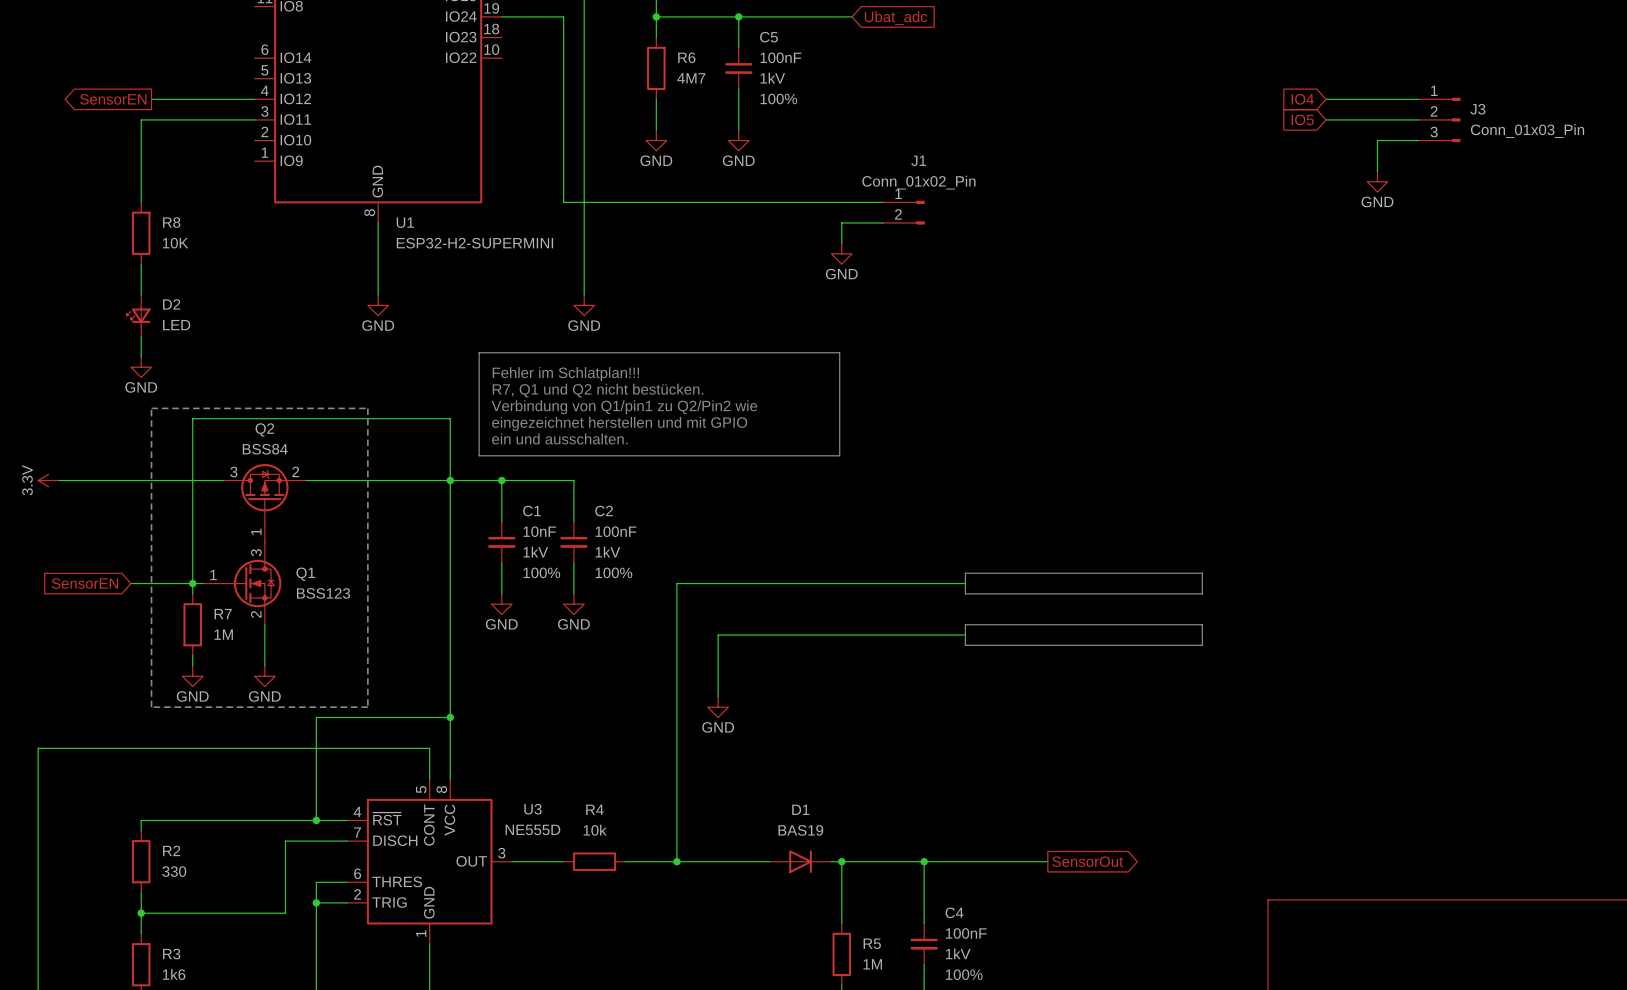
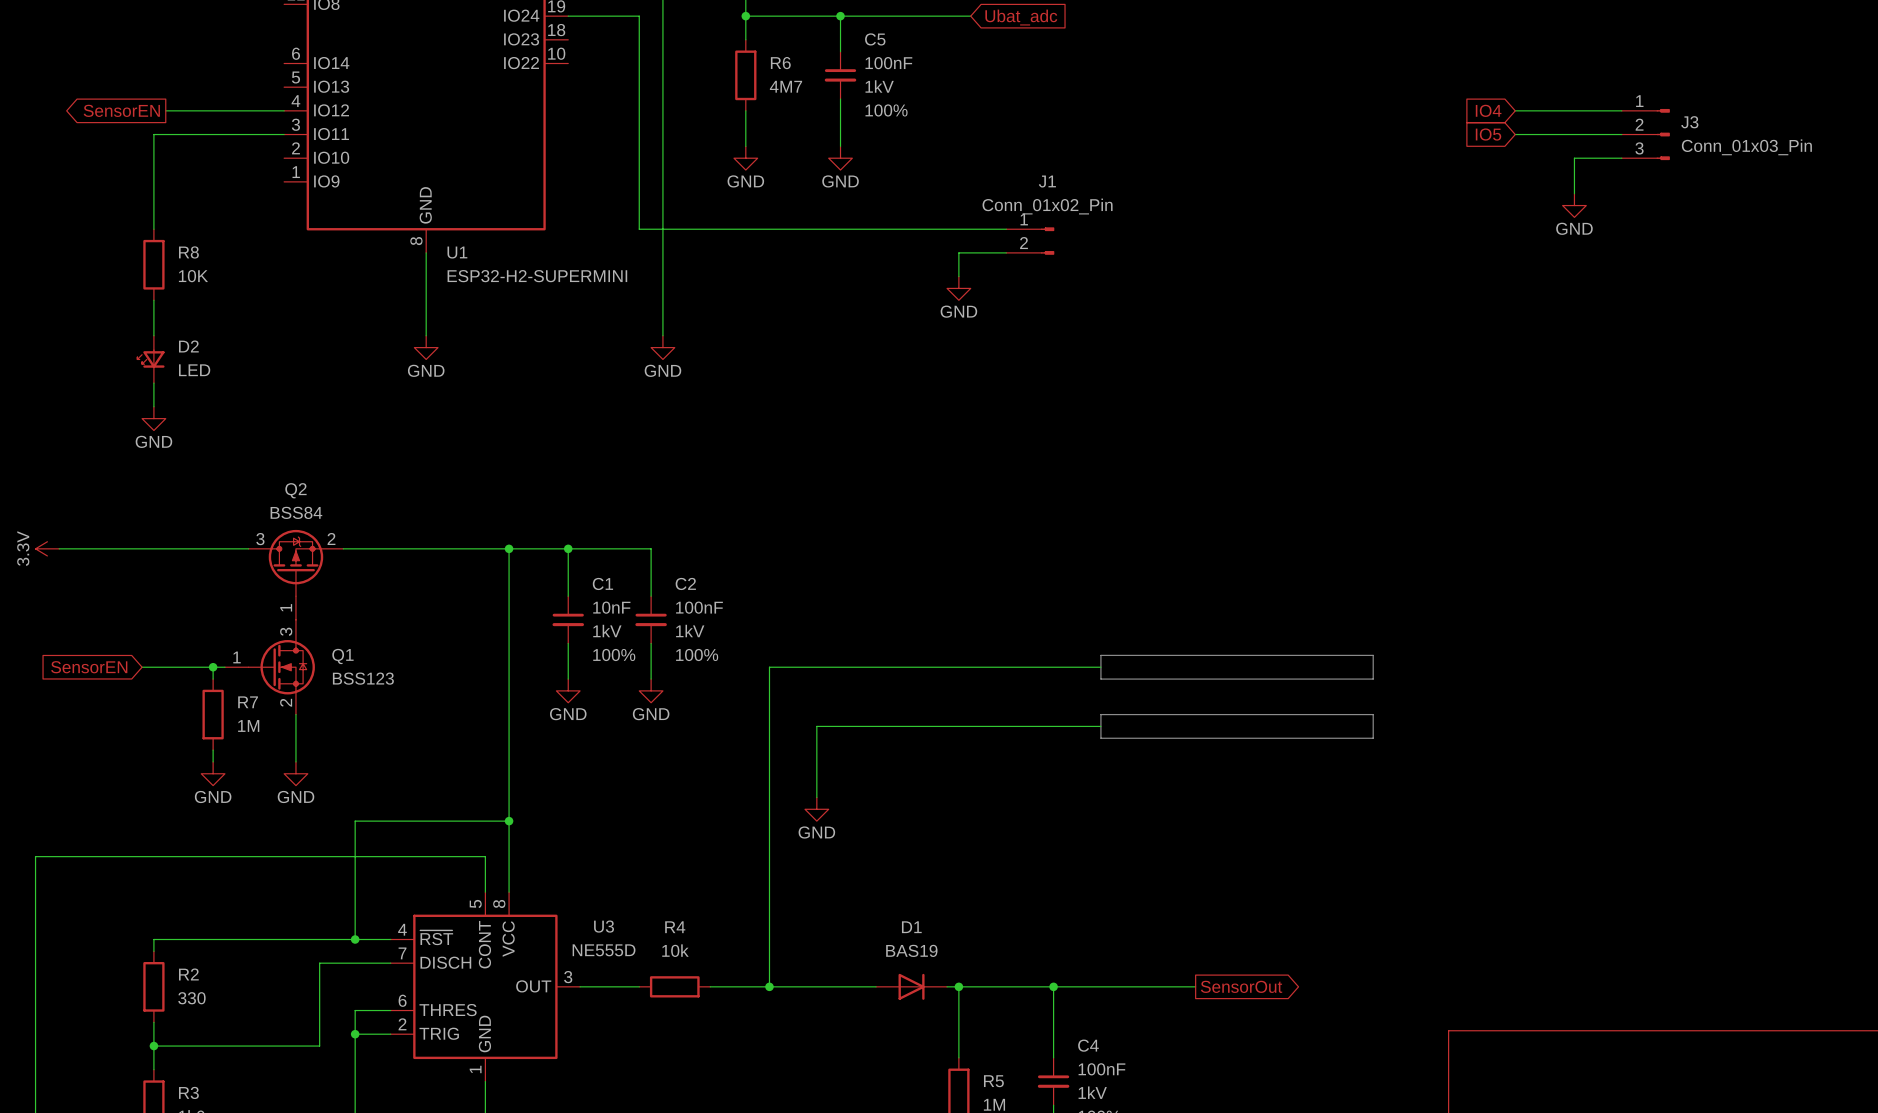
line: (479, 352) (839, 352) (839, 455) (479, 455) (479, 352) -> none
text: Fehler im Schlatplan!!! (565, 374) -> none
text: R7, Q1 und Q2 nicht bestücken. (597, 390) -> none
text: Verbindung von Q1/pin1 zu Q2/Pin2 wie (624, 407) -> none
line: (151, 408) (367, 408) (367, 707) (151, 707) (151, 408) -> none
text: eingezeichnet herstellen und mit GPIO (619, 423) -> none
text: ein und ausschalten. (559, 438) -> none
wire: (450, 480) (450, 418) (192, 418) (192, 583) -> none

